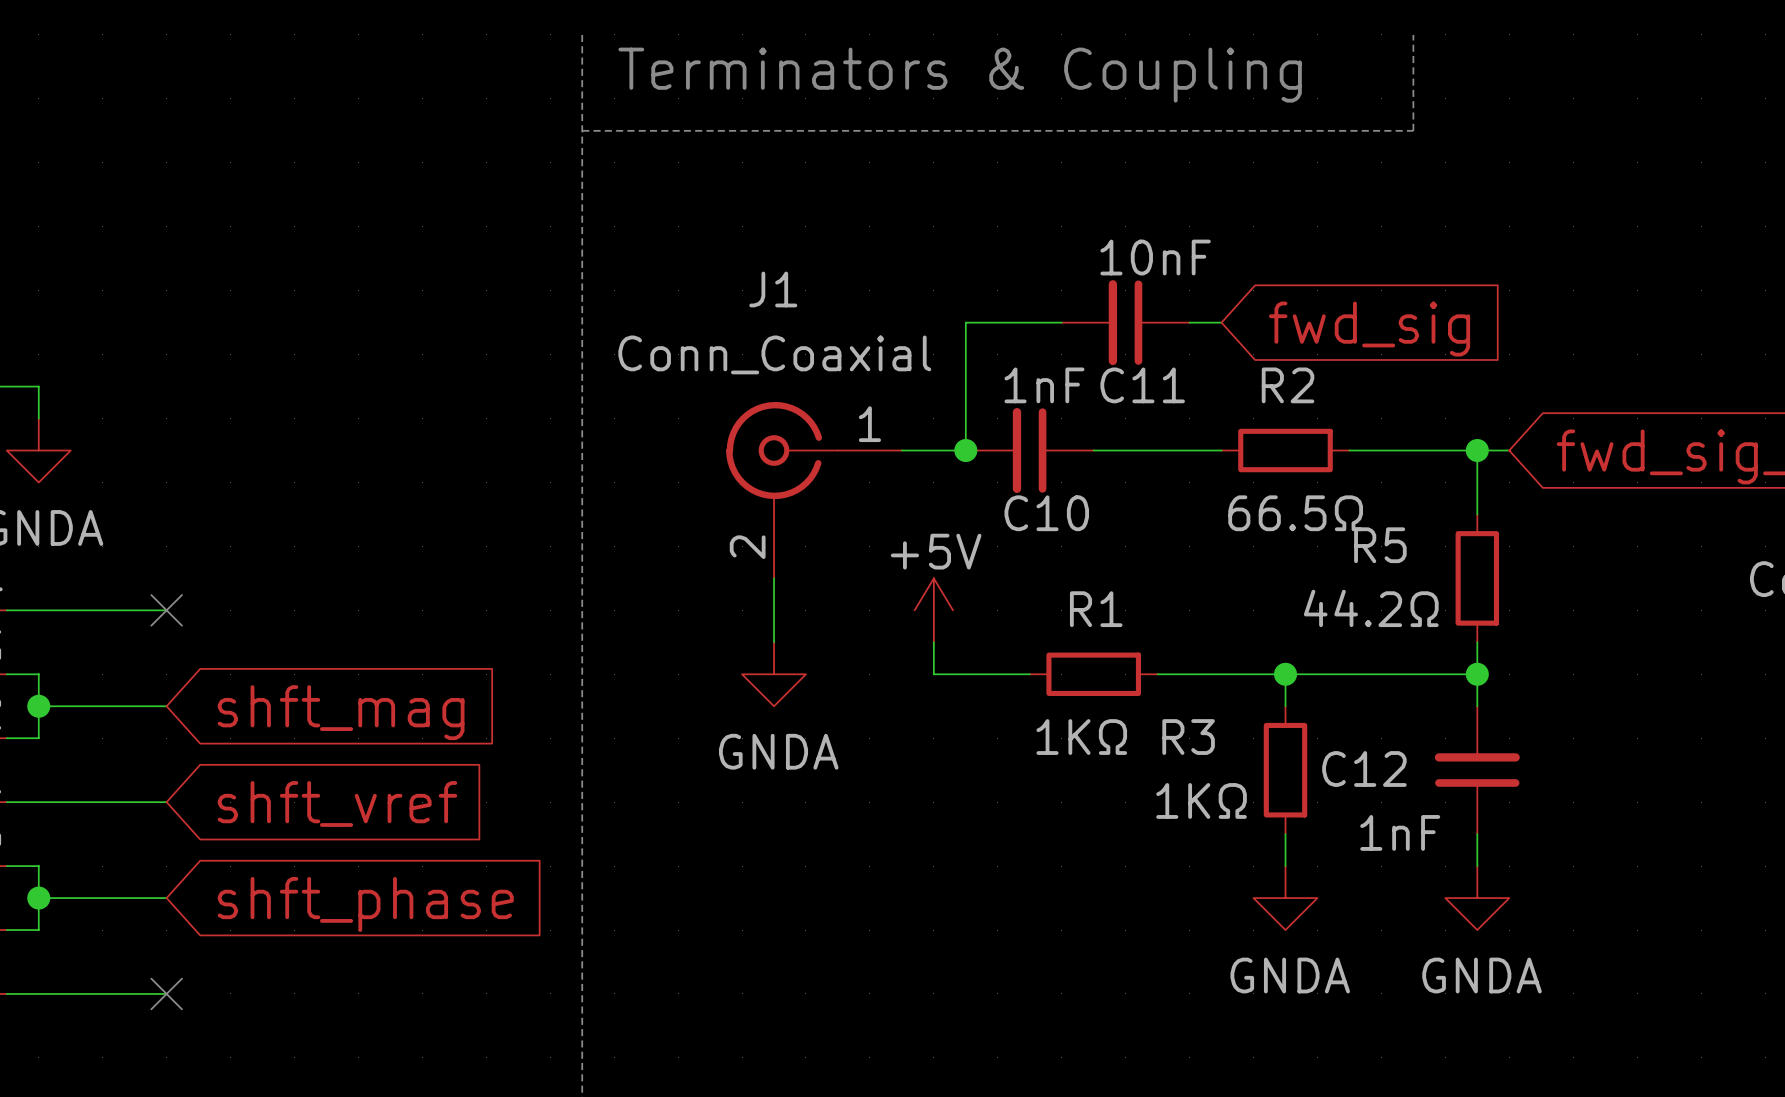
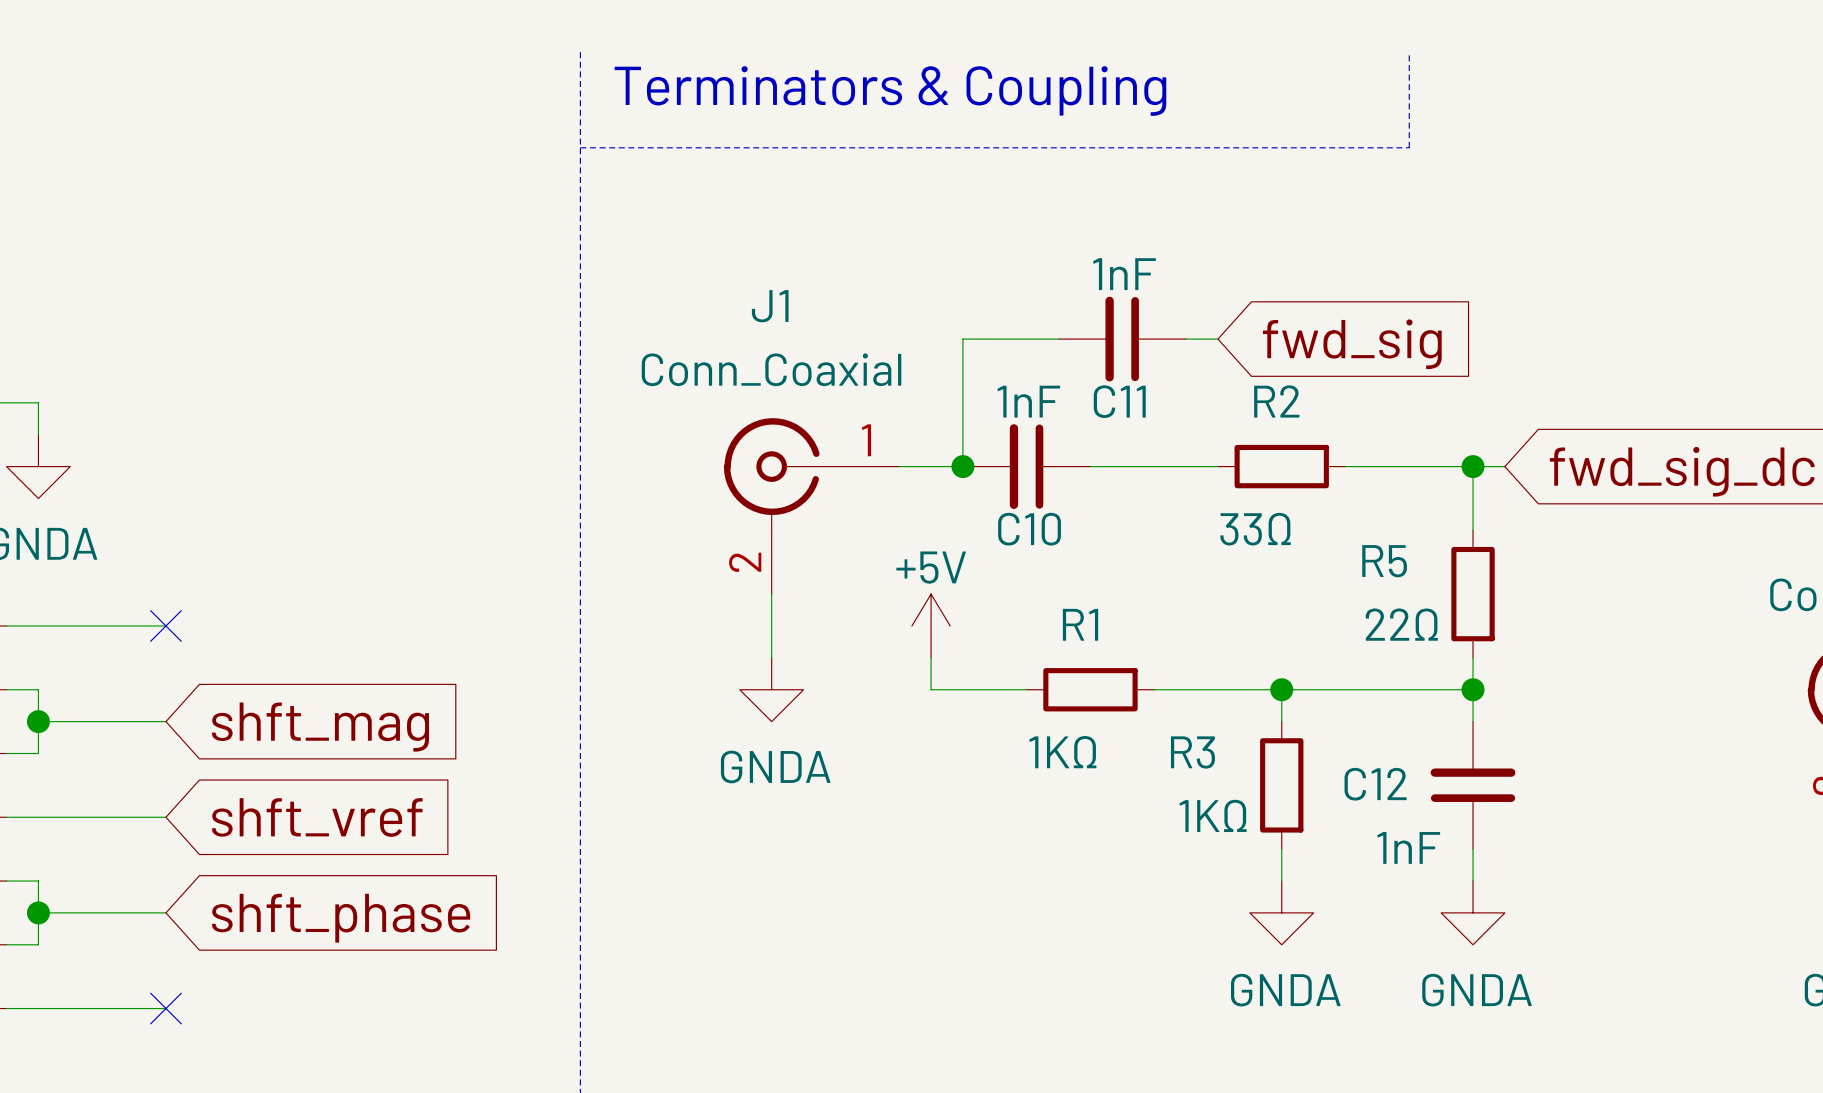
C11 value: 10nF (1155, 257) -> 1nF (1124, 274)
R2 value: 66.5Ω (1295, 513) -> 33Ω (1255, 529)
R5 value: 44.2Ω (1371, 608) -> 22Ω (1401, 624)

